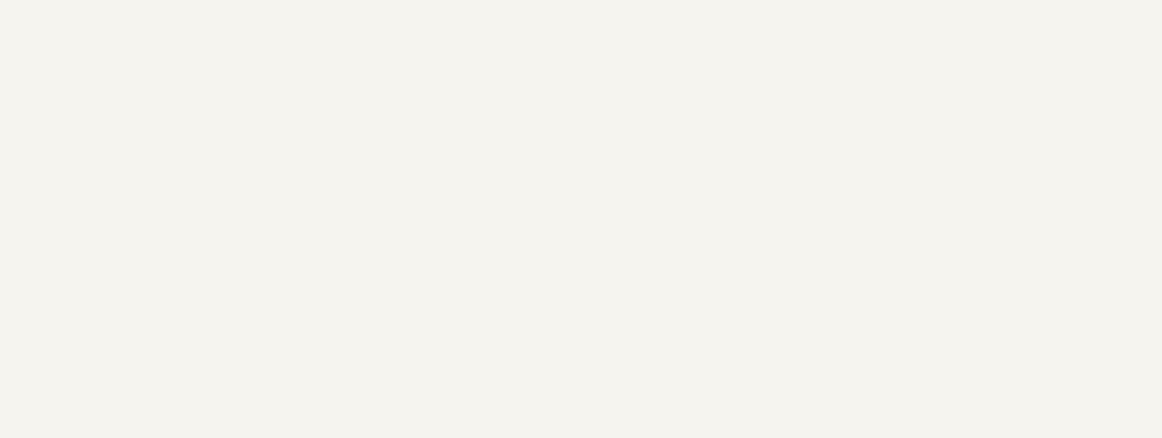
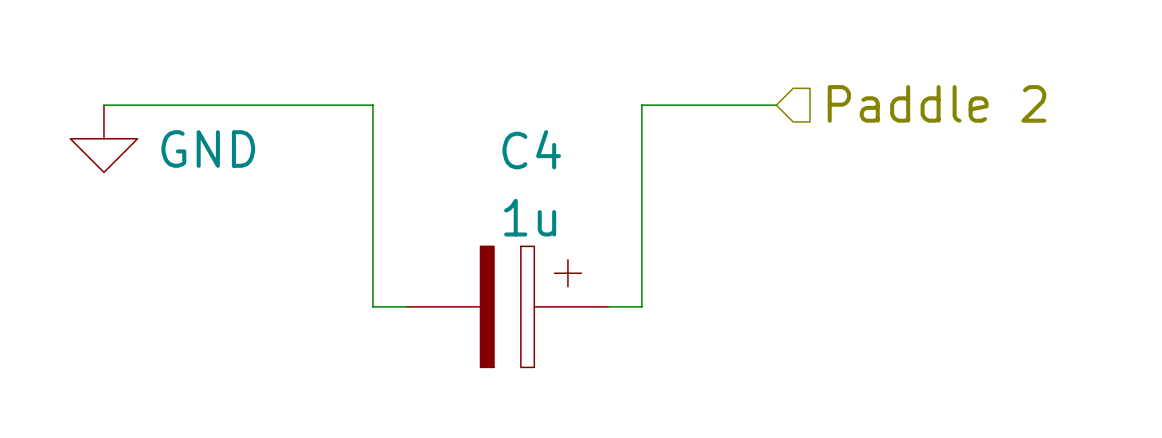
hierarchical label: none -> Paddle 2 (936, 103)
wire: none -> (103, 105) (372, 105) (372, 306) (406, 306)
wire: none -> (776, 105) (641, 105) (641, 306) (608, 306)
power symbol: none -> GND (103, 138)
C4: none -> 1u (507, 306)

